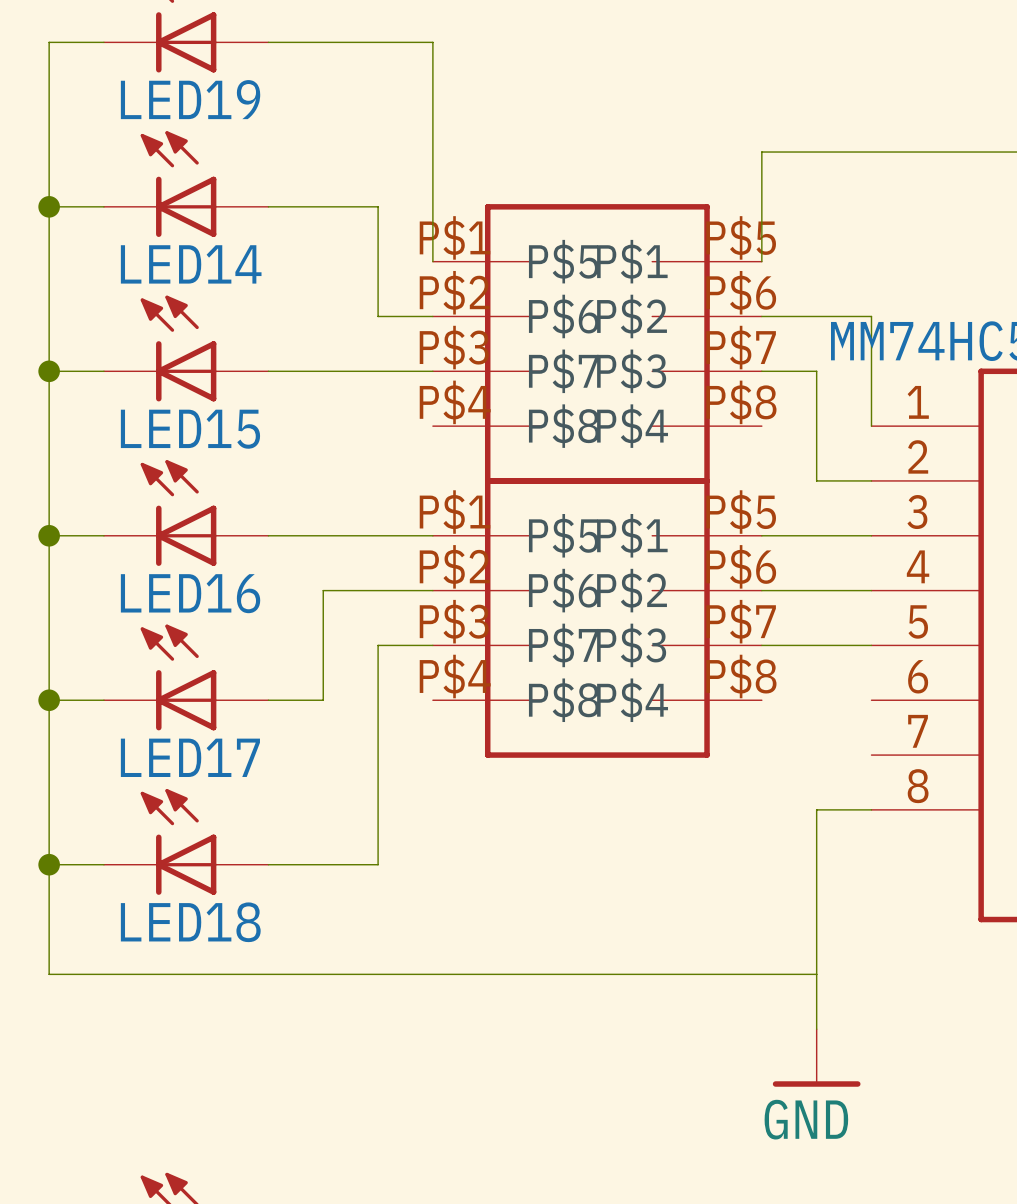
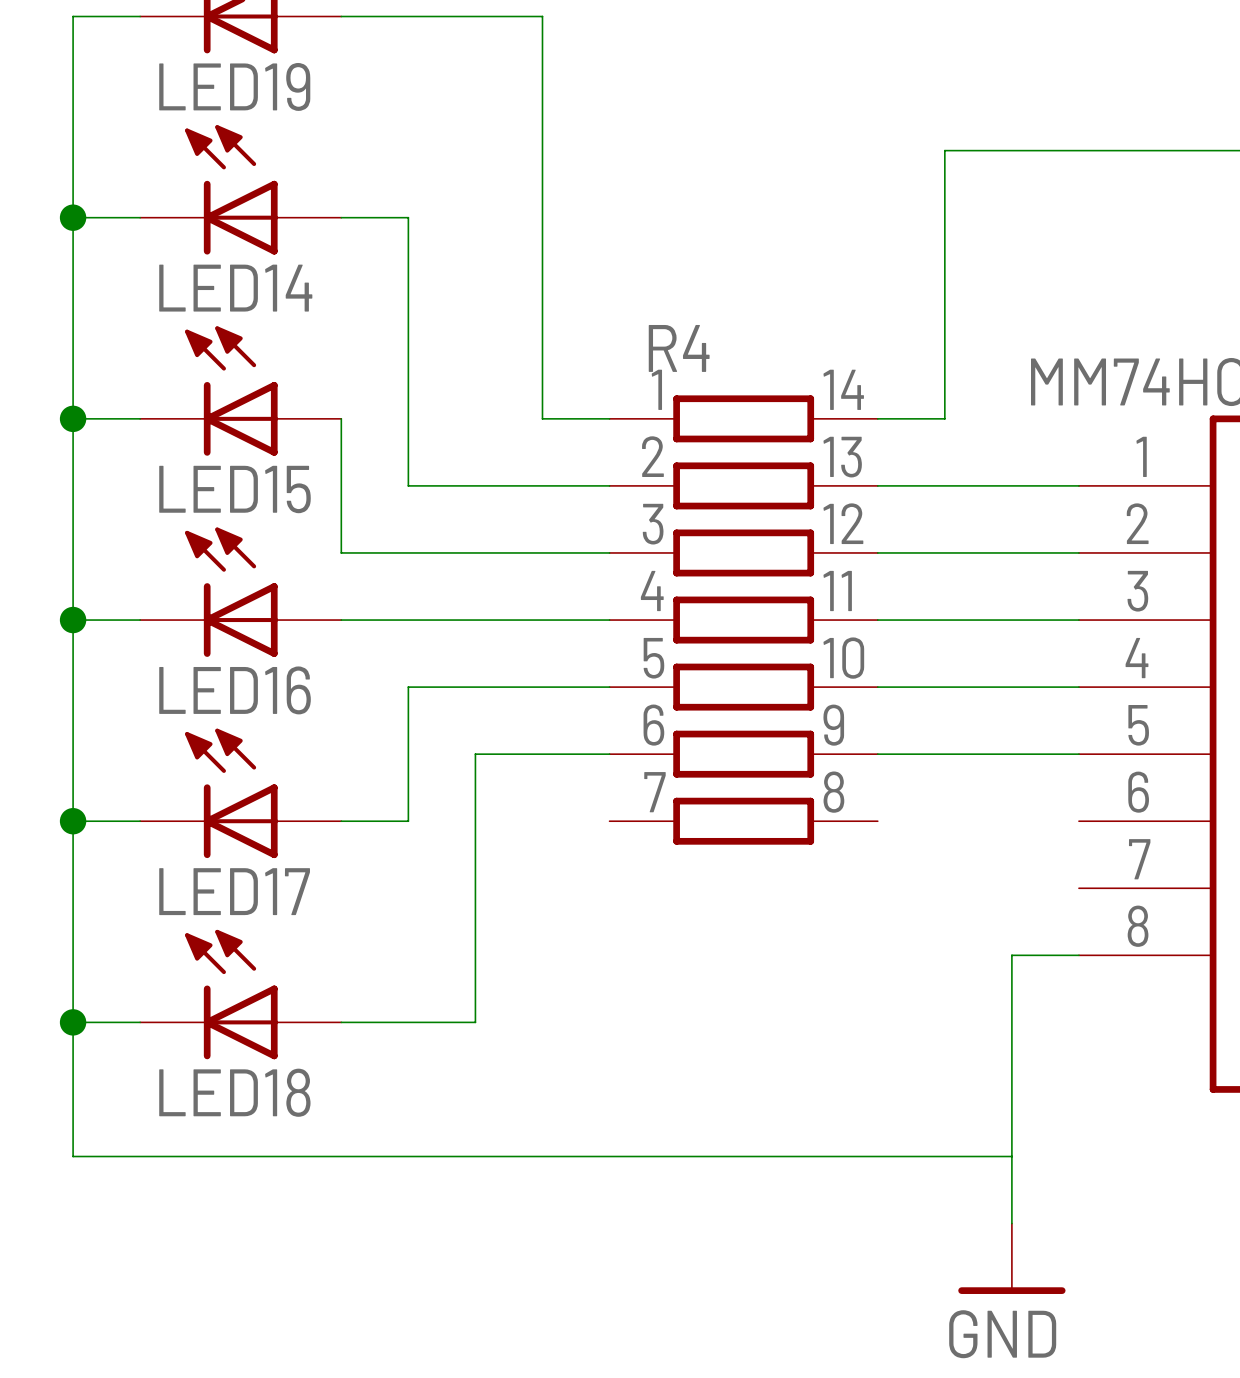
wire: (323, 206) (378, 206) (378, 316) (432, 316) -> (408, 217) (408, 485) (609, 485)
wire: none -> (542, 284) (542, 418) (609, 418)
wire: none -> (944, 284) (944, 418) (877, 418)
wire: (761, 316) (871, 316) (871, 426) -> (877, 485) (1078, 485)
part: (597, 343) -> none
wire: (268, 371) (432, 371) -> (341, 418) (341, 552) (609, 552)
wire: (761, 371) (816, 371) (816, 480) -> (877, 552) (1011, 552)
R4: none -> (743, 620)
part: (597, 618) -> none

